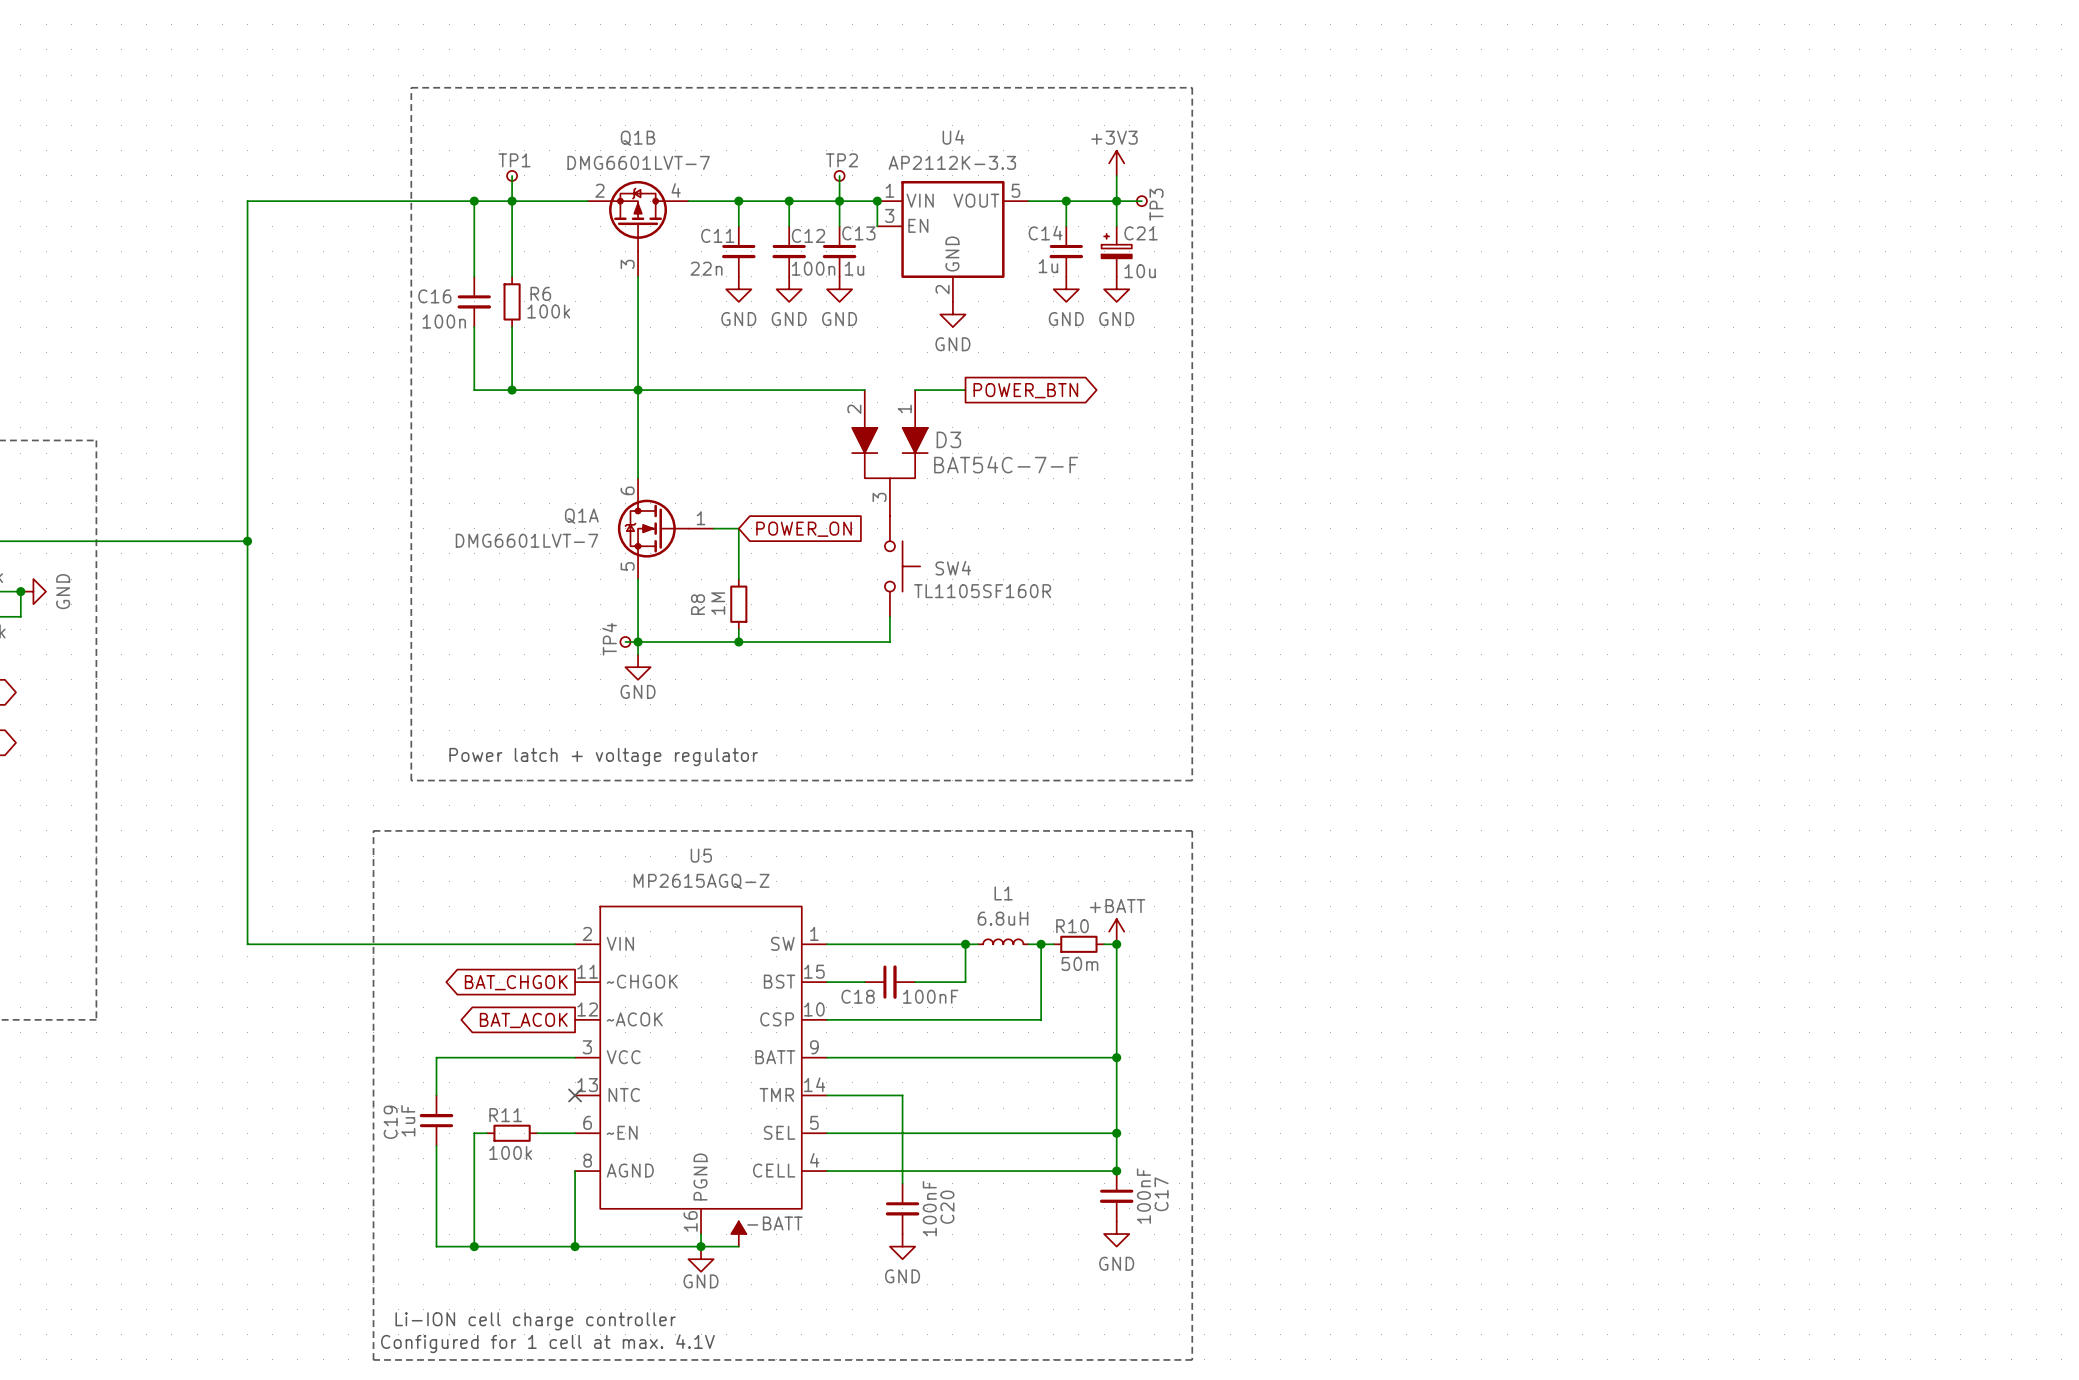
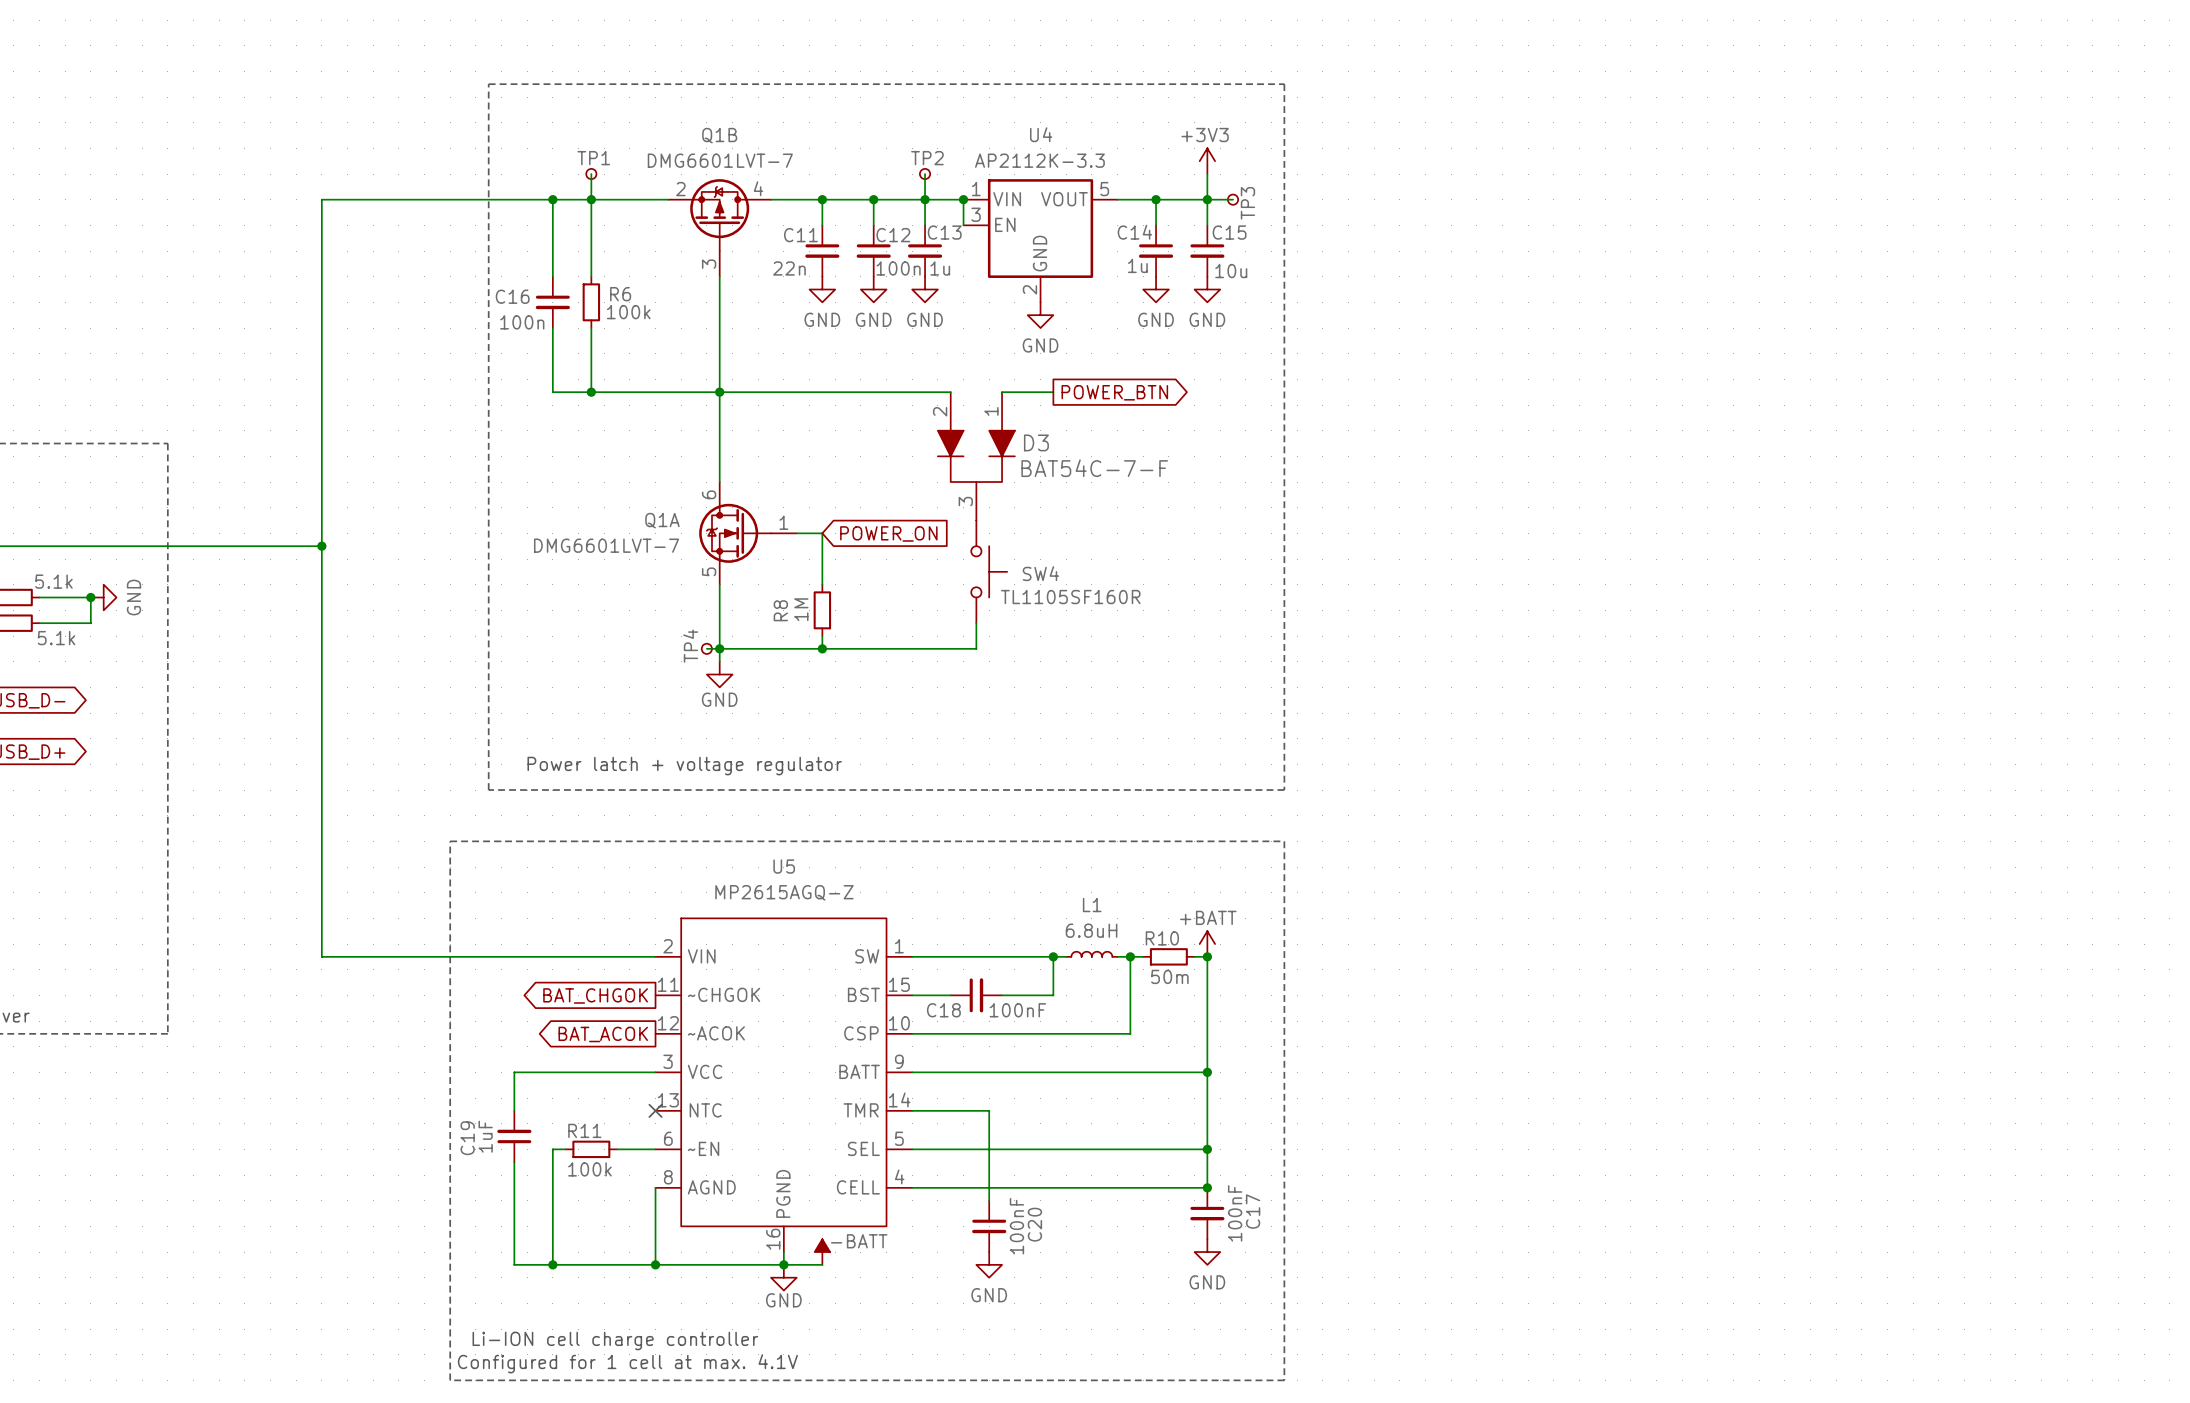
C21: 10u (1116, 251) -> none
C15: none -> 10u (1207, 251)

